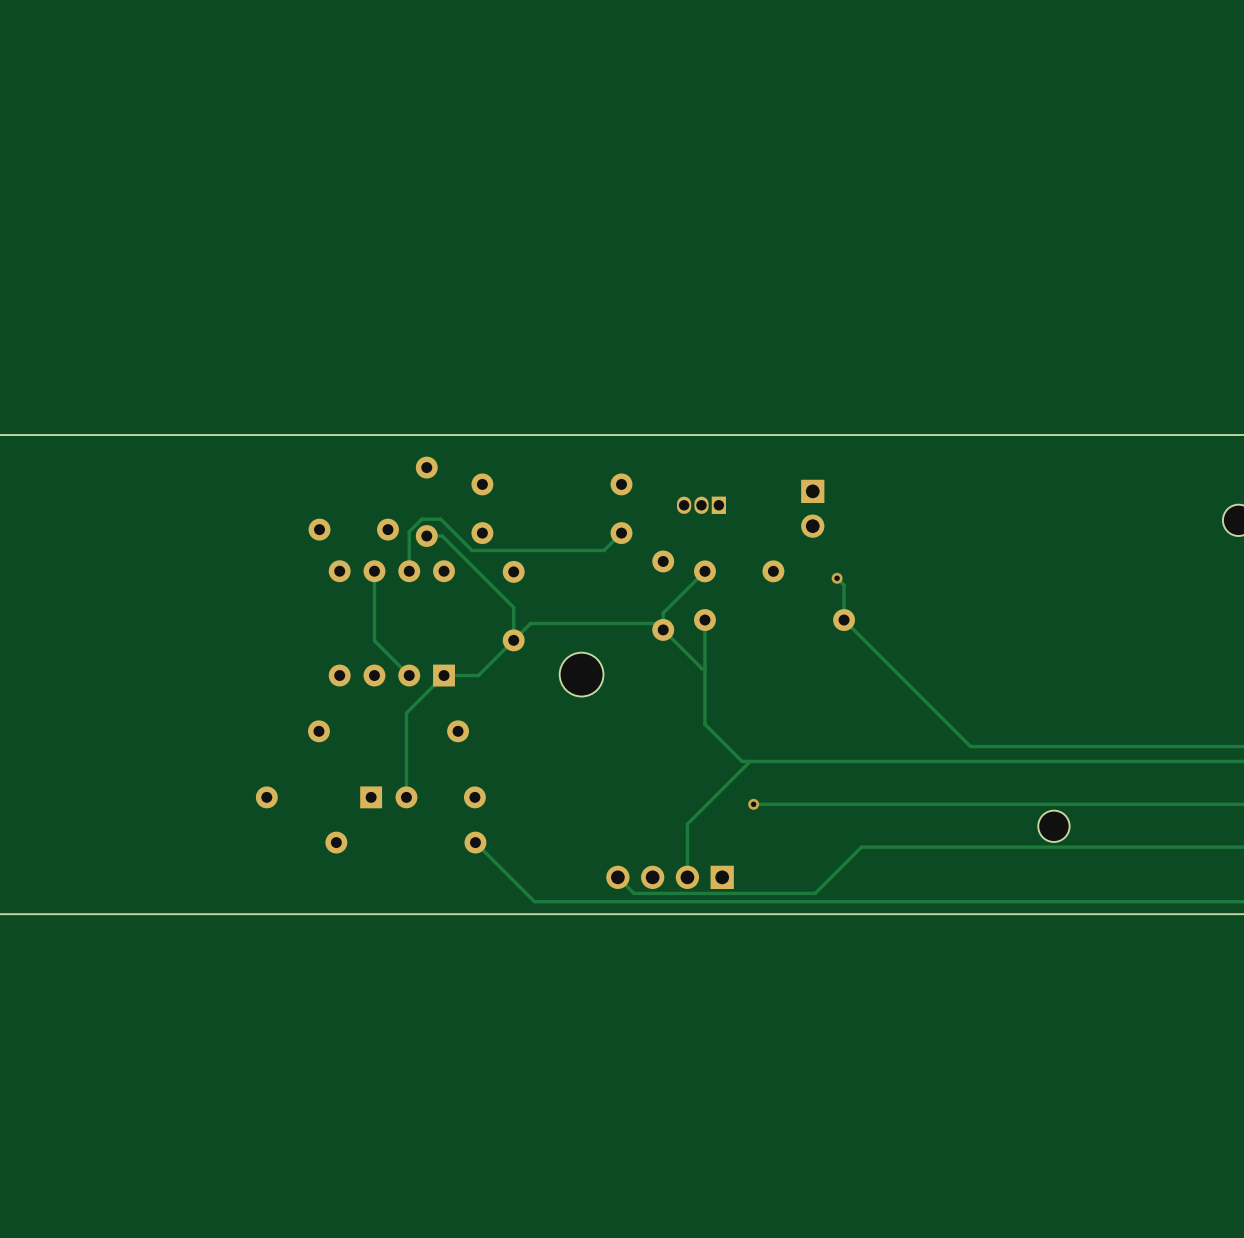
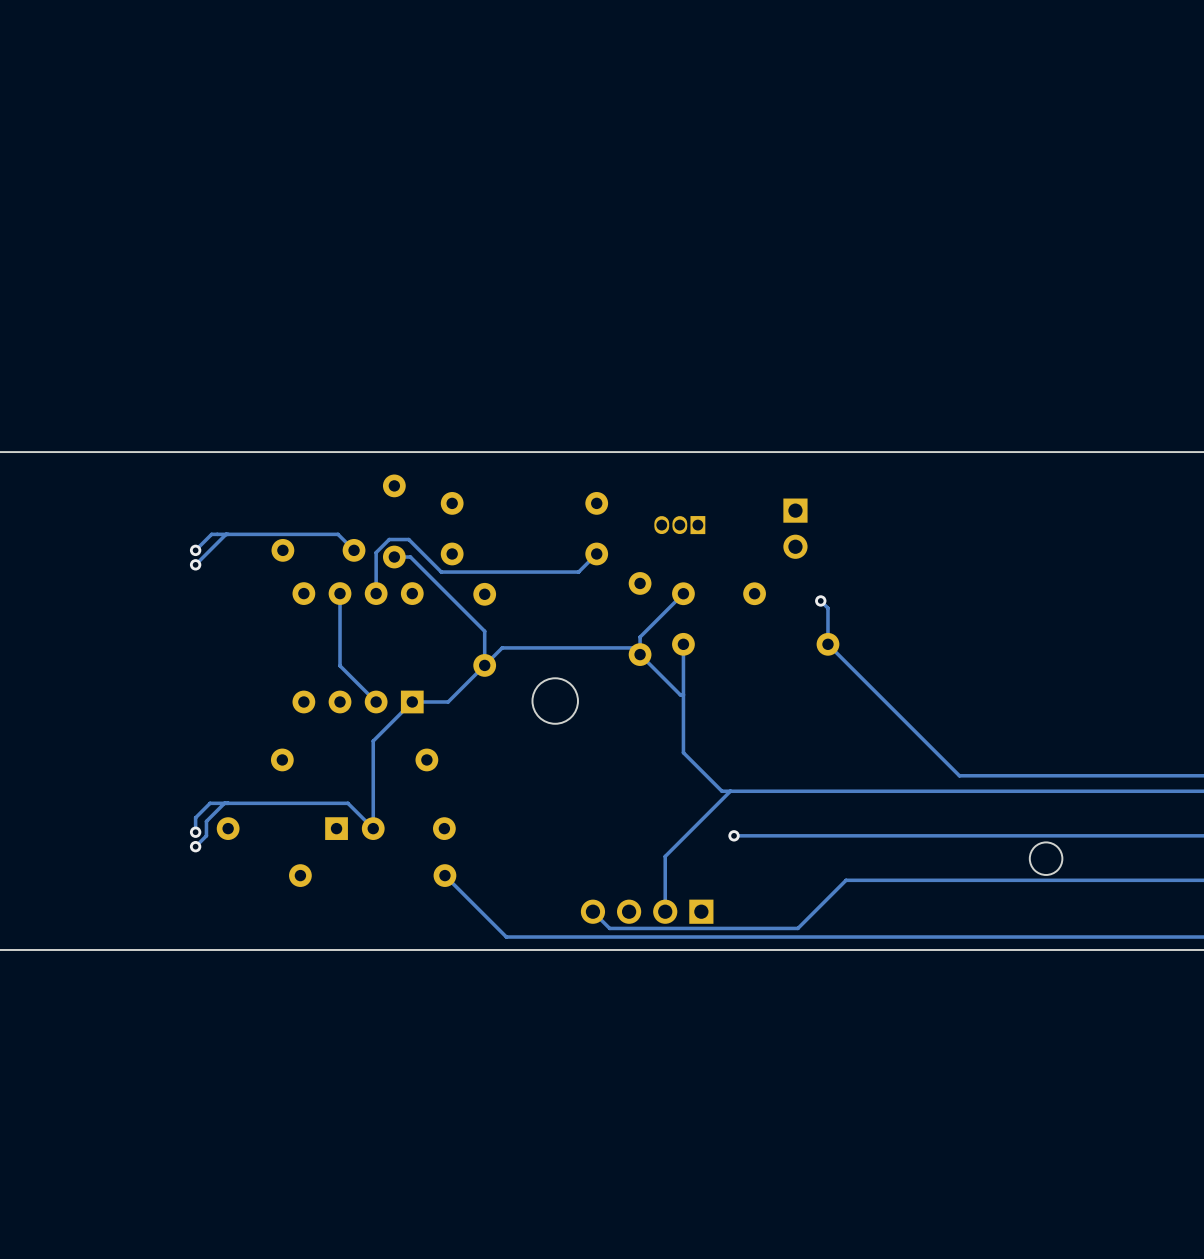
track: none -> (226, 534) (195, 564)
via: none -> (195, 550)
track: none -> (354, 550) (338, 534) (211, 534) (195, 550)
via: none -> (195, 564)
track: none -> (224, 803) (206, 821) (206, 835) (195, 846)
track: none -> (373, 828) (347, 803) (210, 803) (195, 817) (195, 832)
via: none -> (195, 832)
via: none -> (195, 846)

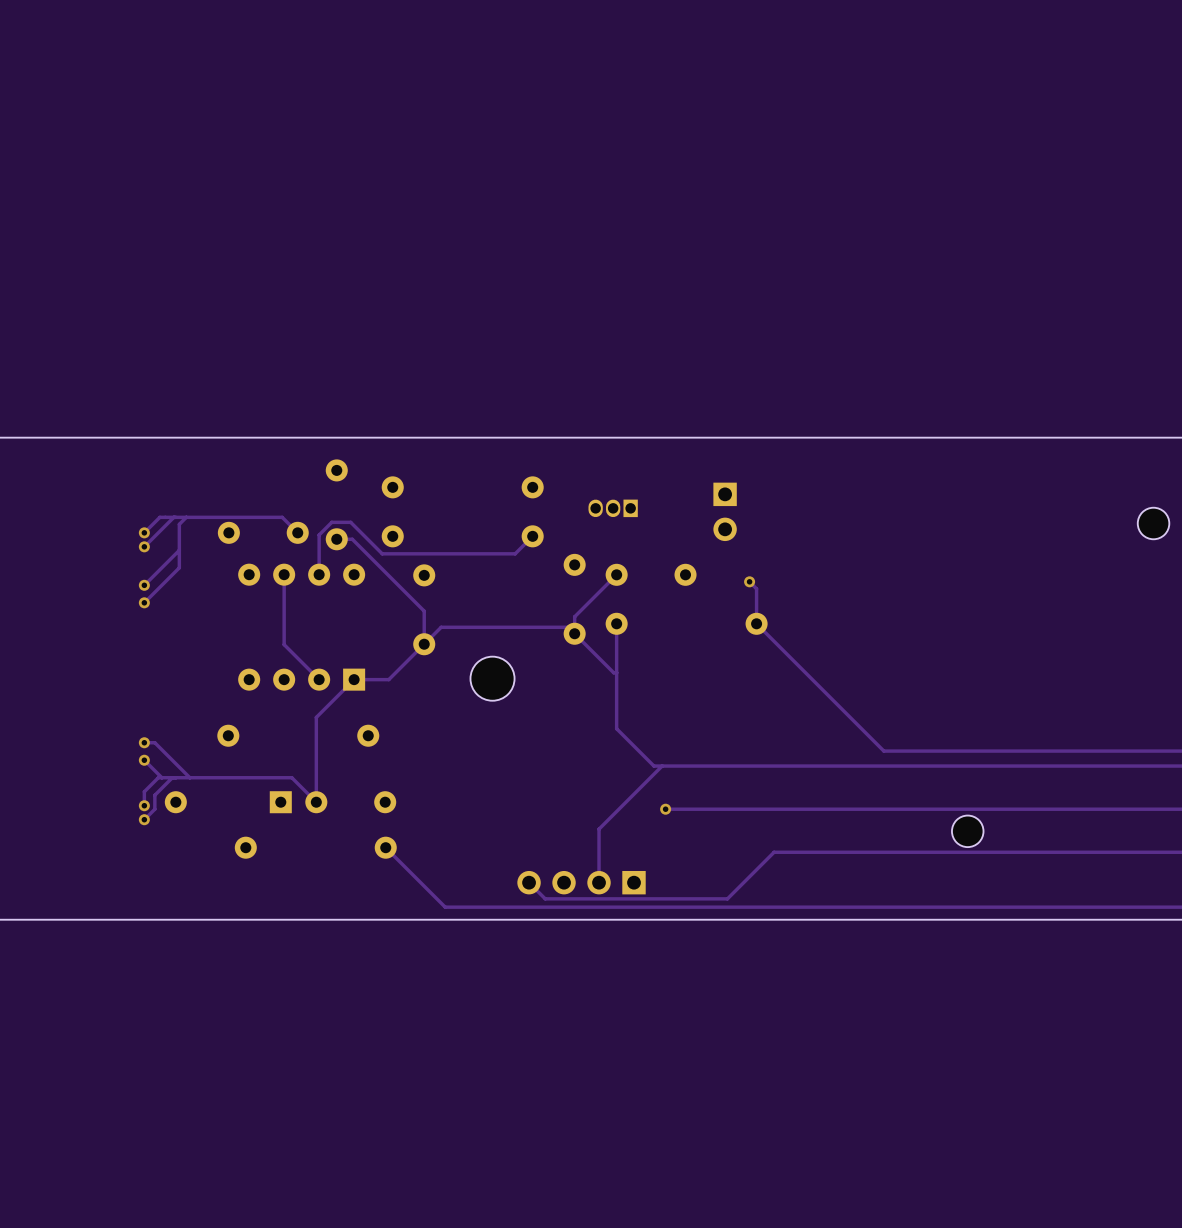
track: none -> (186, 517) (179, 524) (179, 567) (144, 602)
track: none -> (179, 550) (144, 585)
via: none -> (144, 585)
via: none -> (144, 602)
track: none -> (144, 742) (154, 742) (189, 777)
via: none -> (144, 742)
track: none -> (144, 760) (161, 777)
via: none -> (144, 760)

